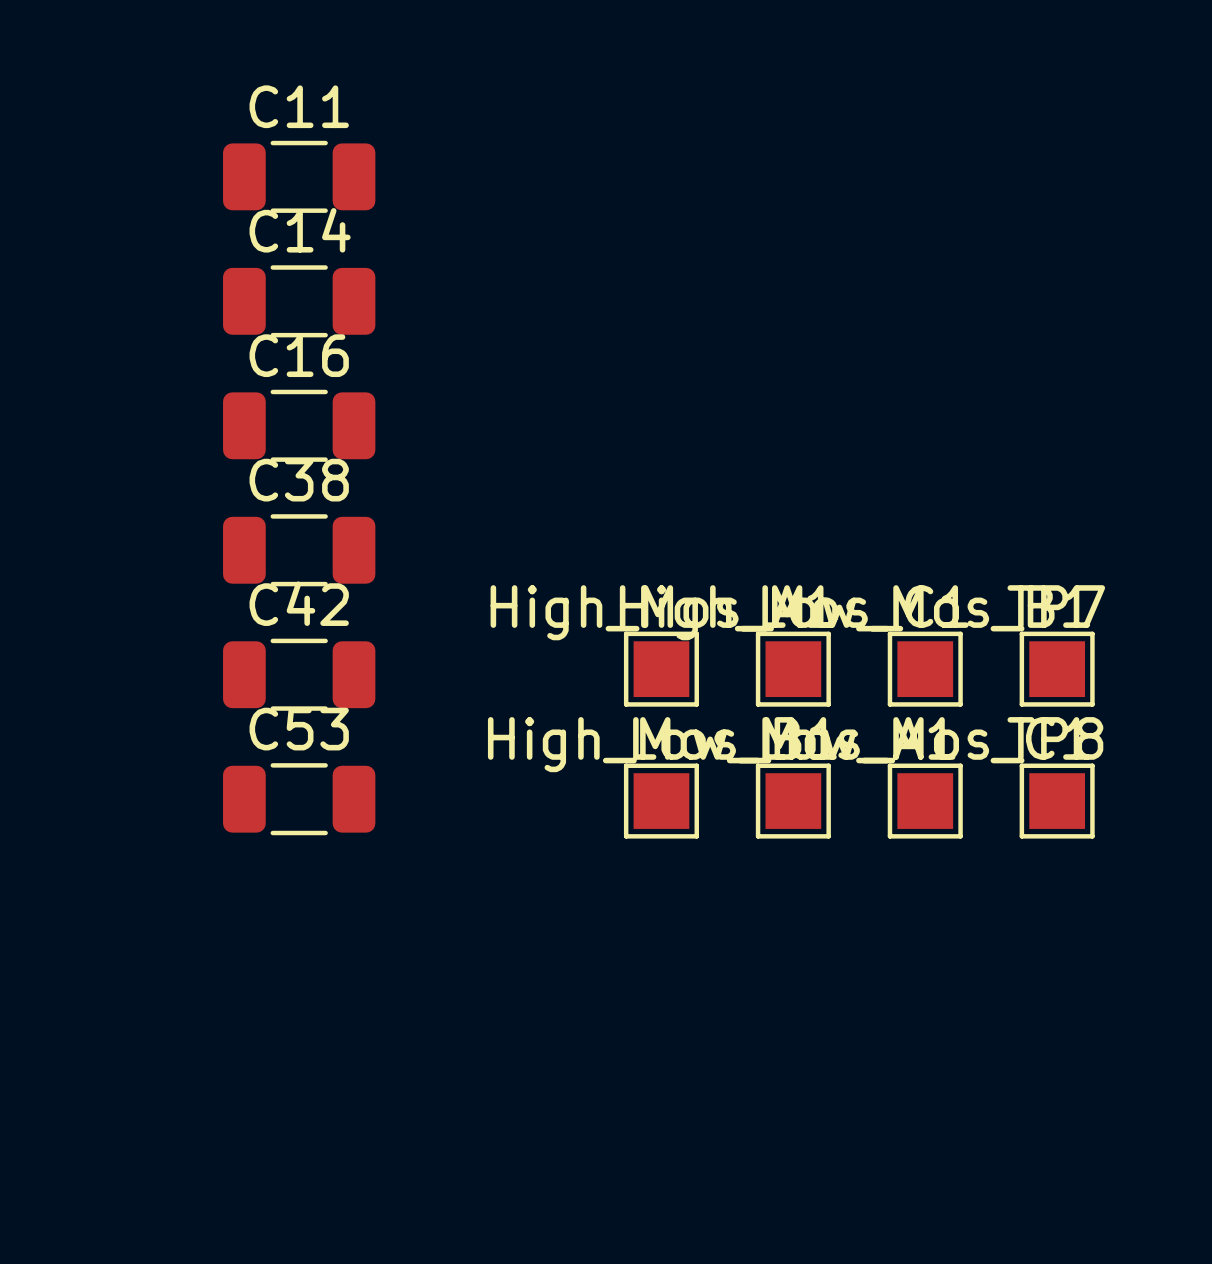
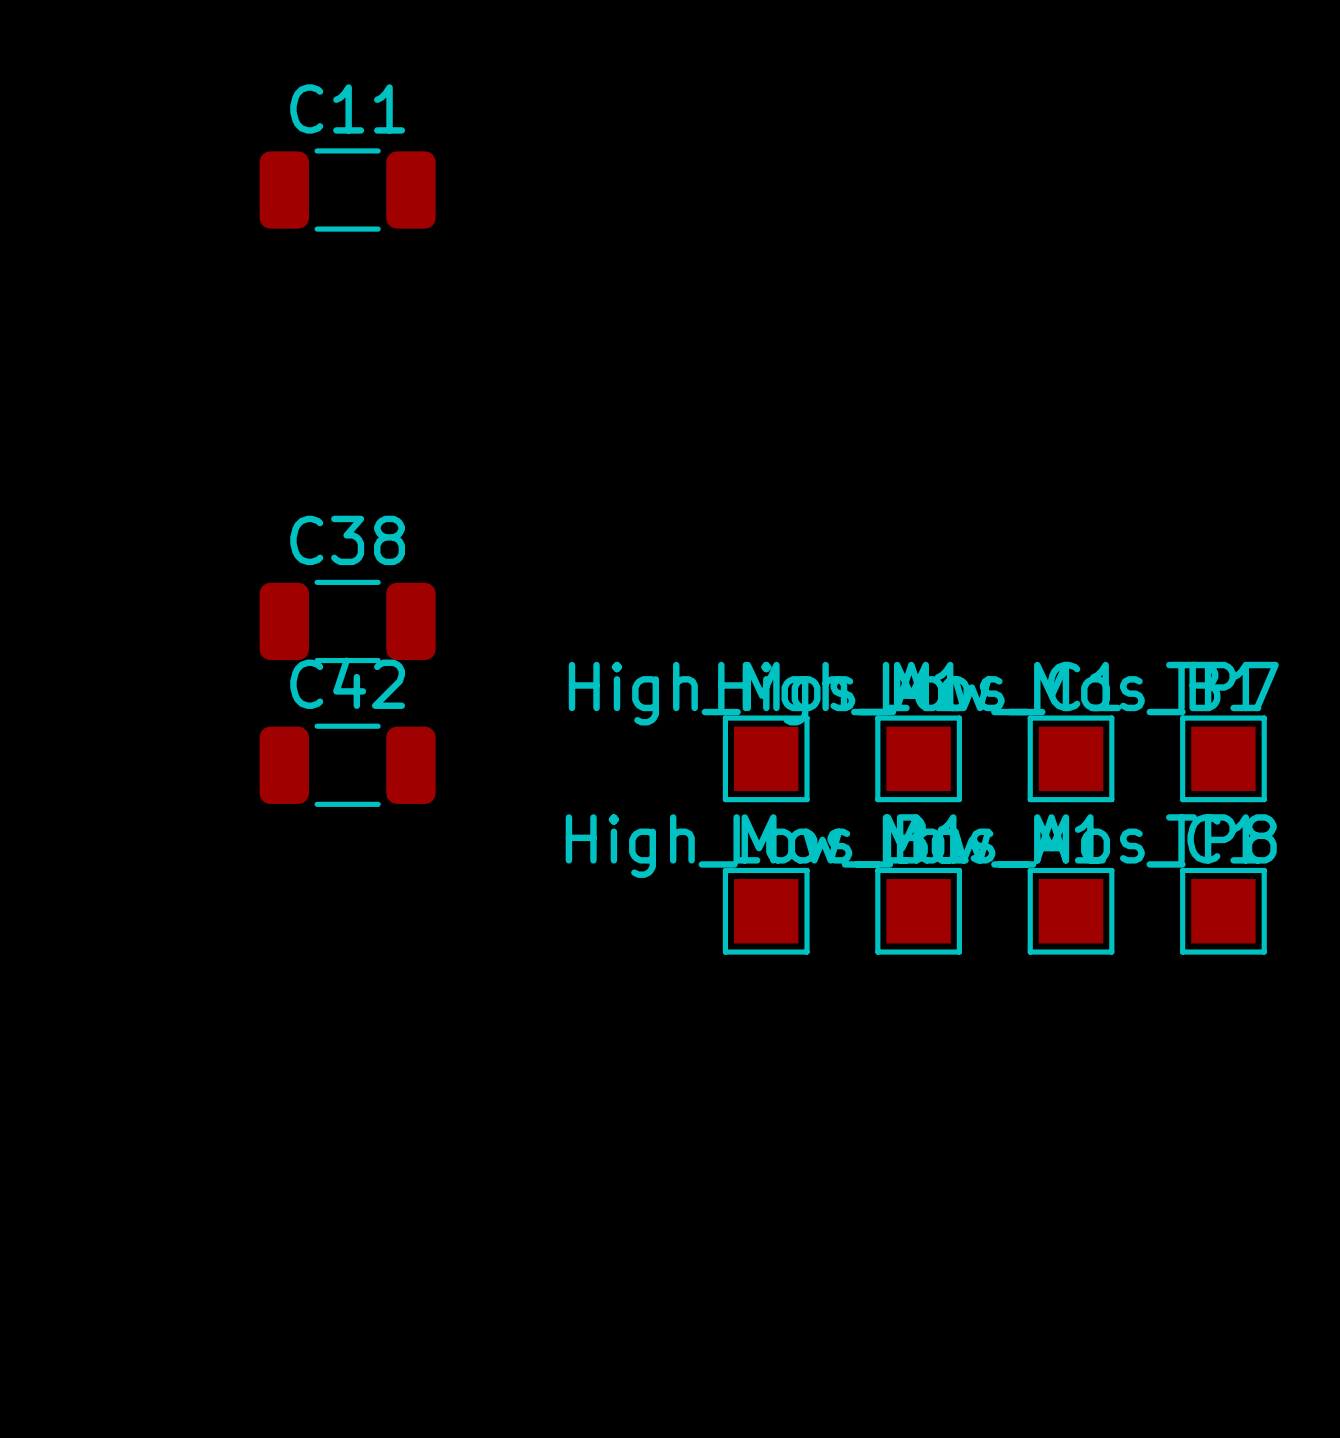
C14: (299, 301) -> none
C16: (299, 425) -> none
C53: (299, 799) -> none

